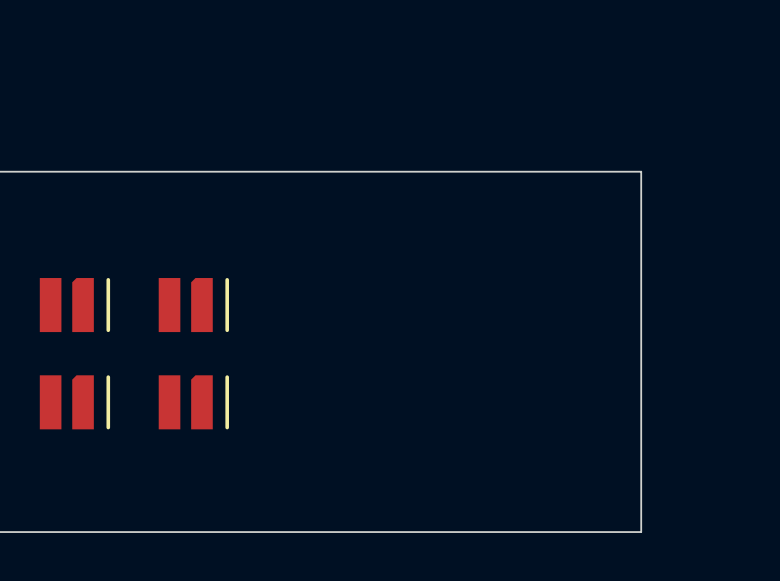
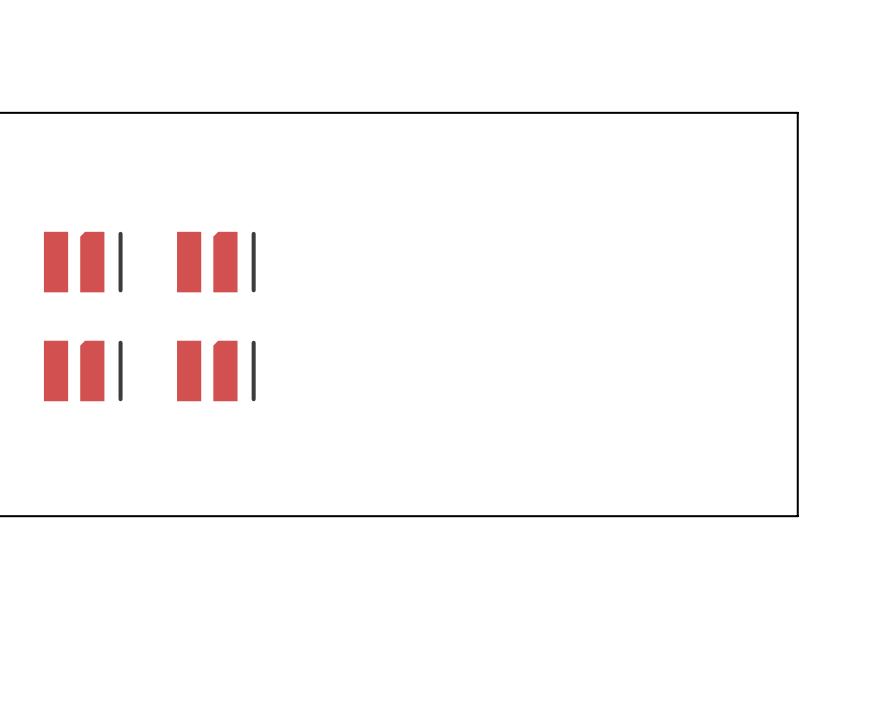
board edge: (641, 171) (641, 532) -> (717, 112) (797, 112) (797, 516) (717, 516)

